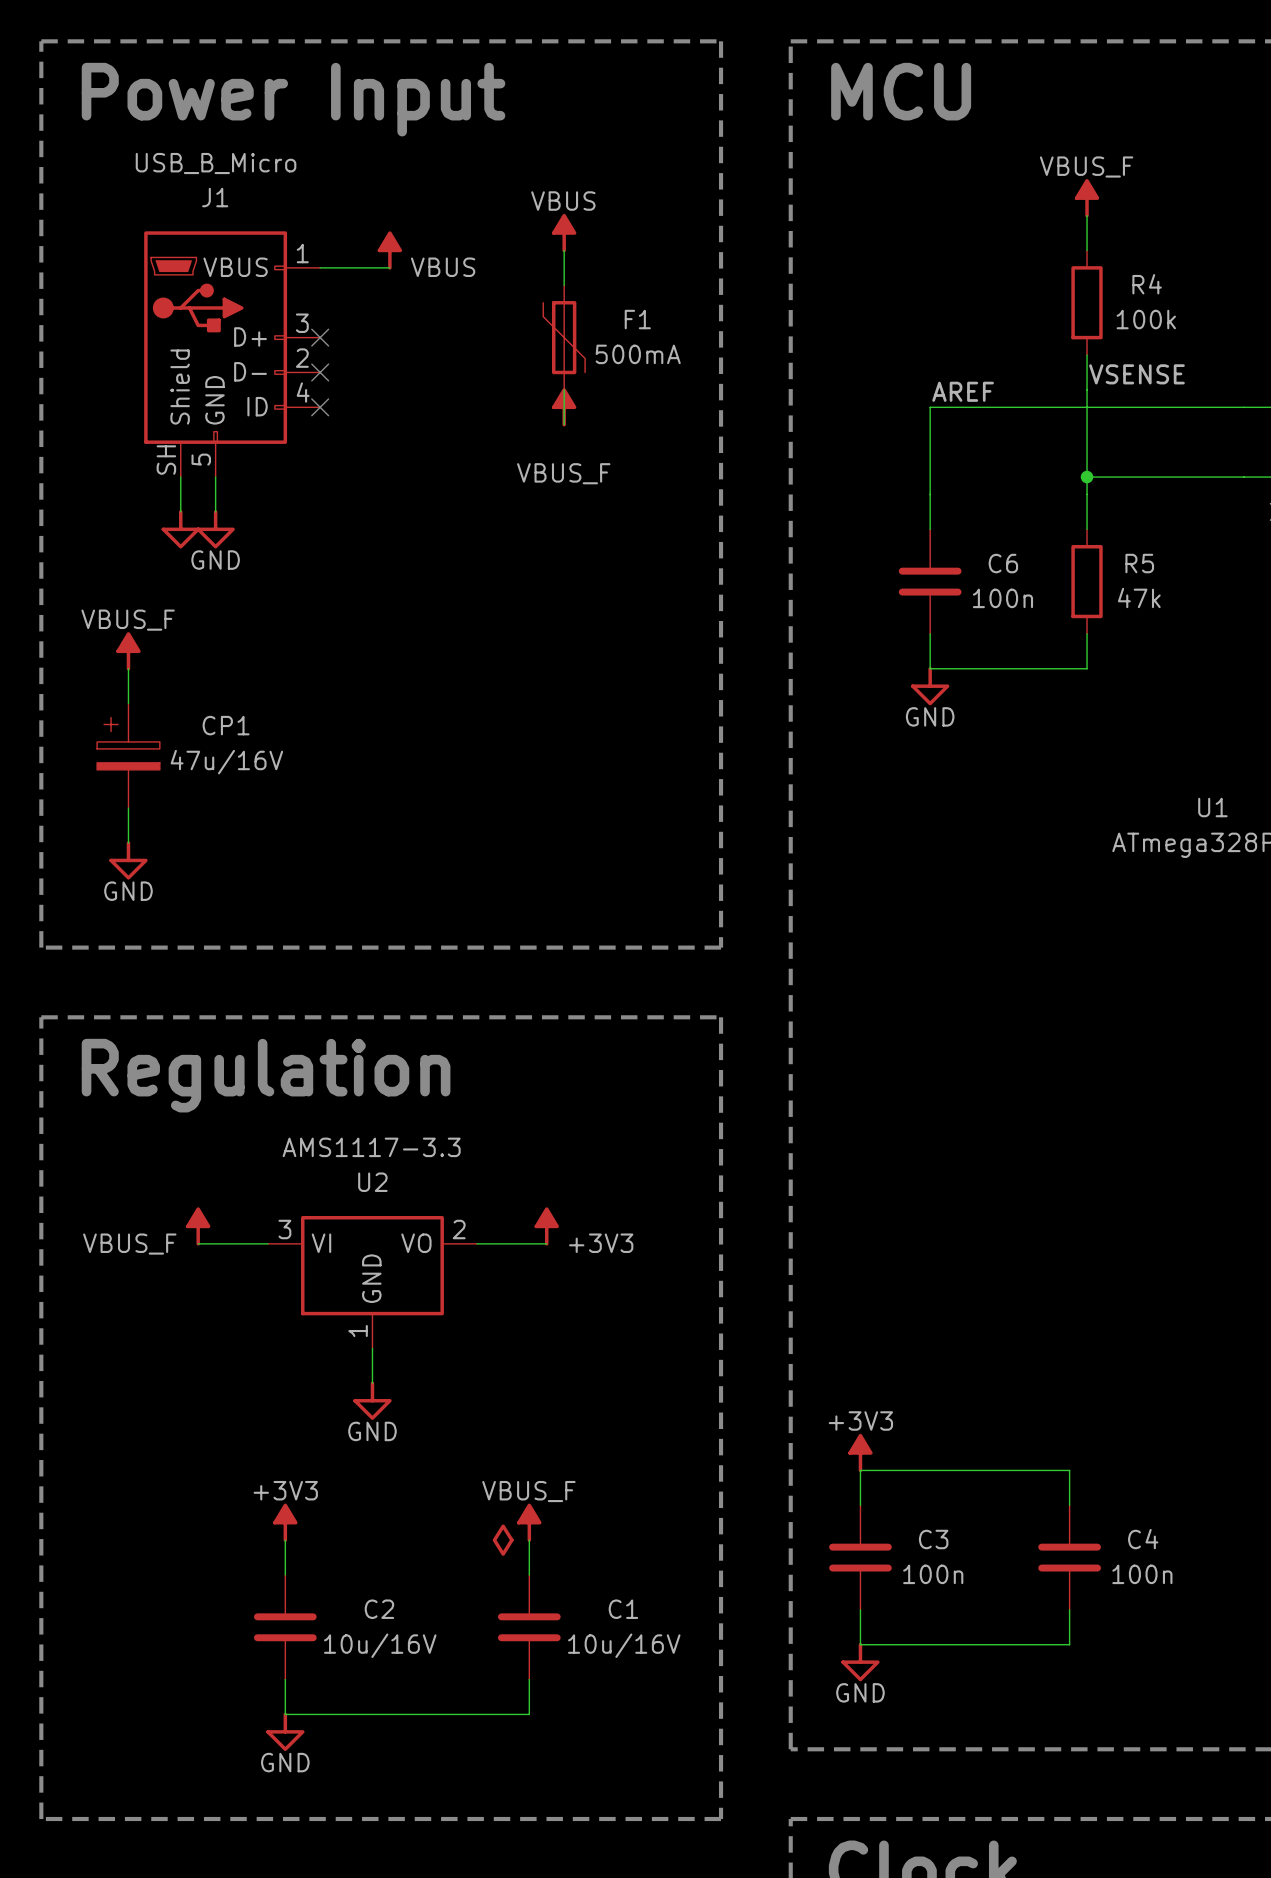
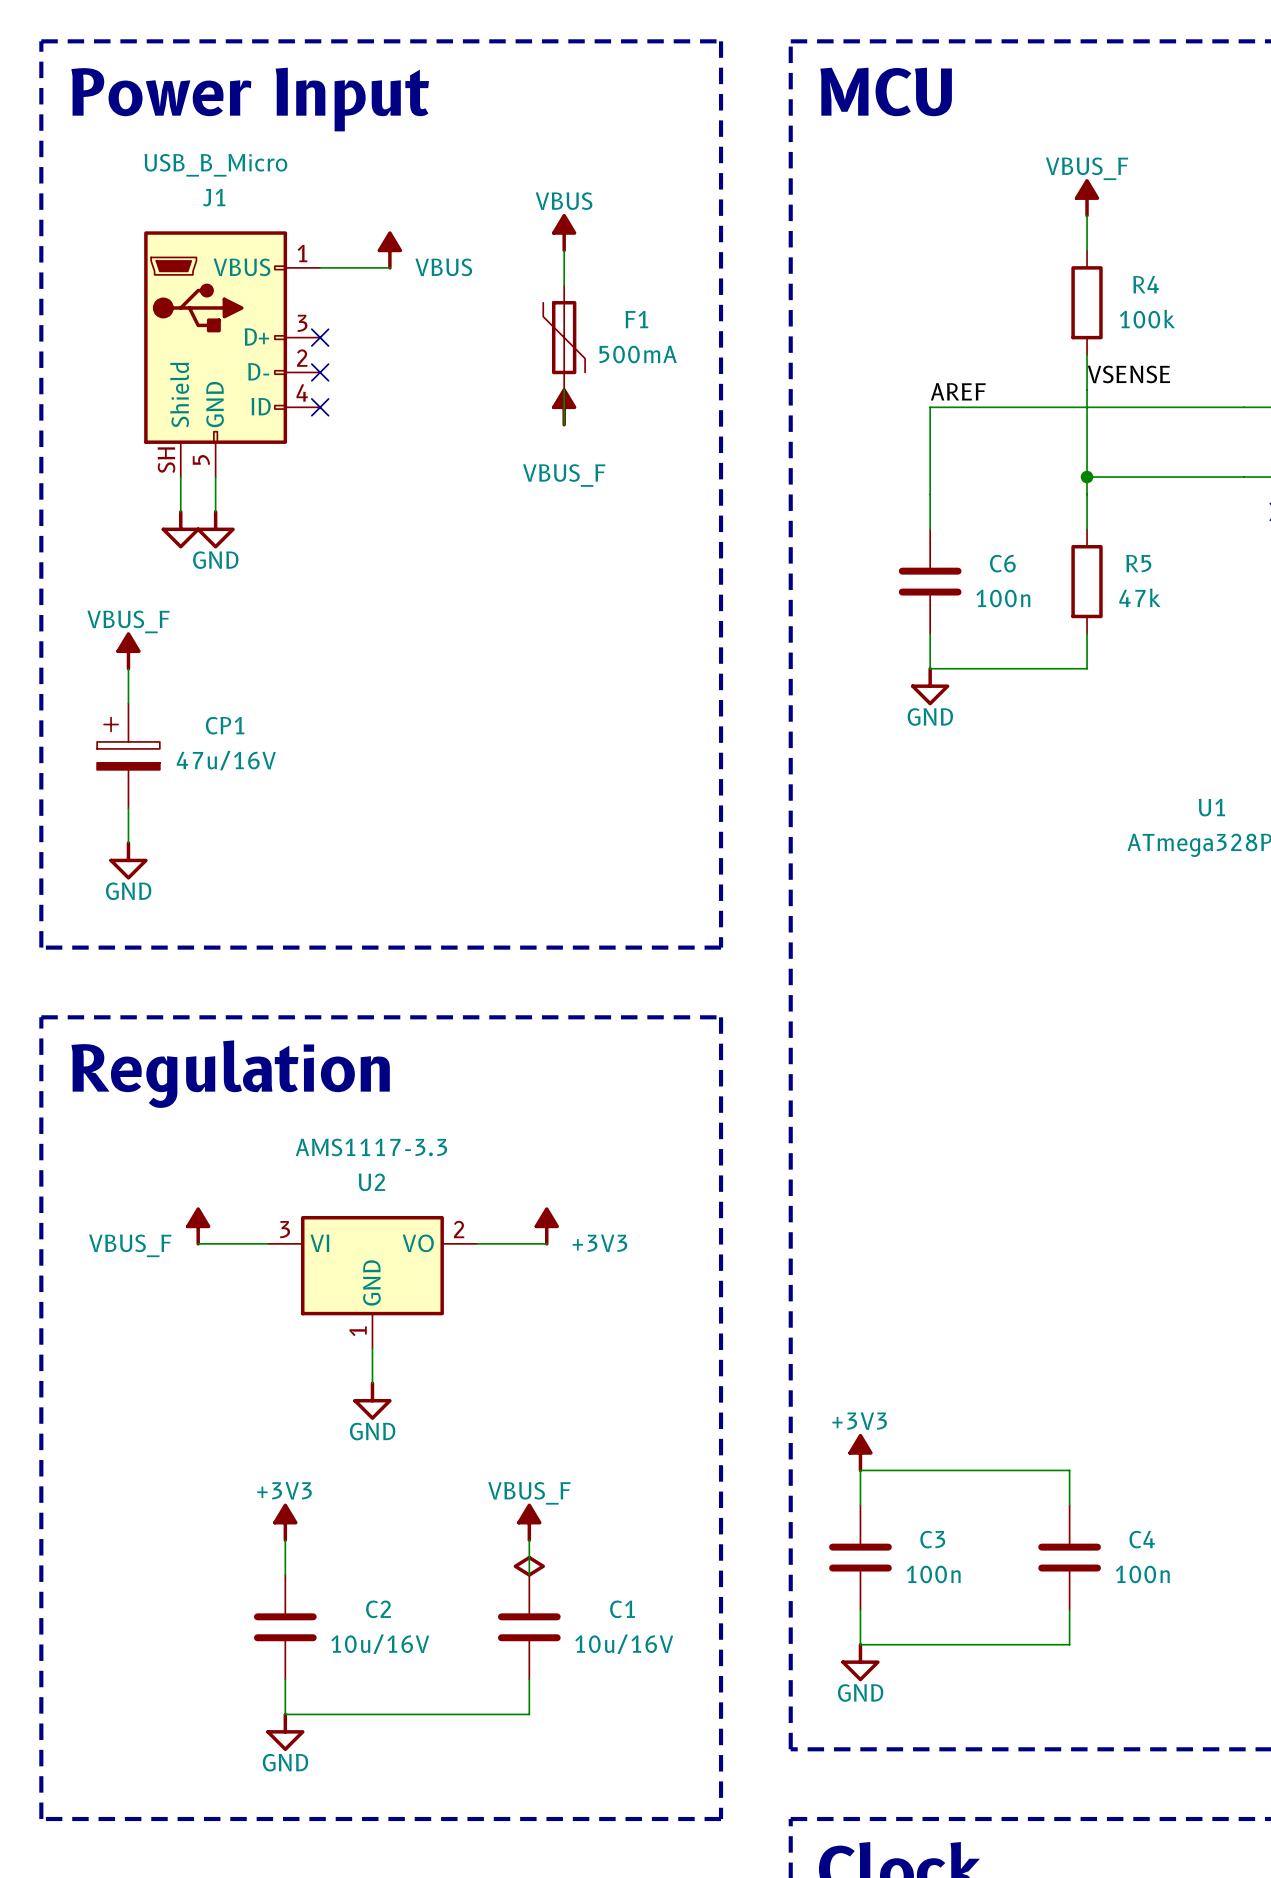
power symbol rotation: 0° (503, 1540) -> 90° clockwise (529, 1566)
power symbol position: (503, 1540) -> (529, 1566)

